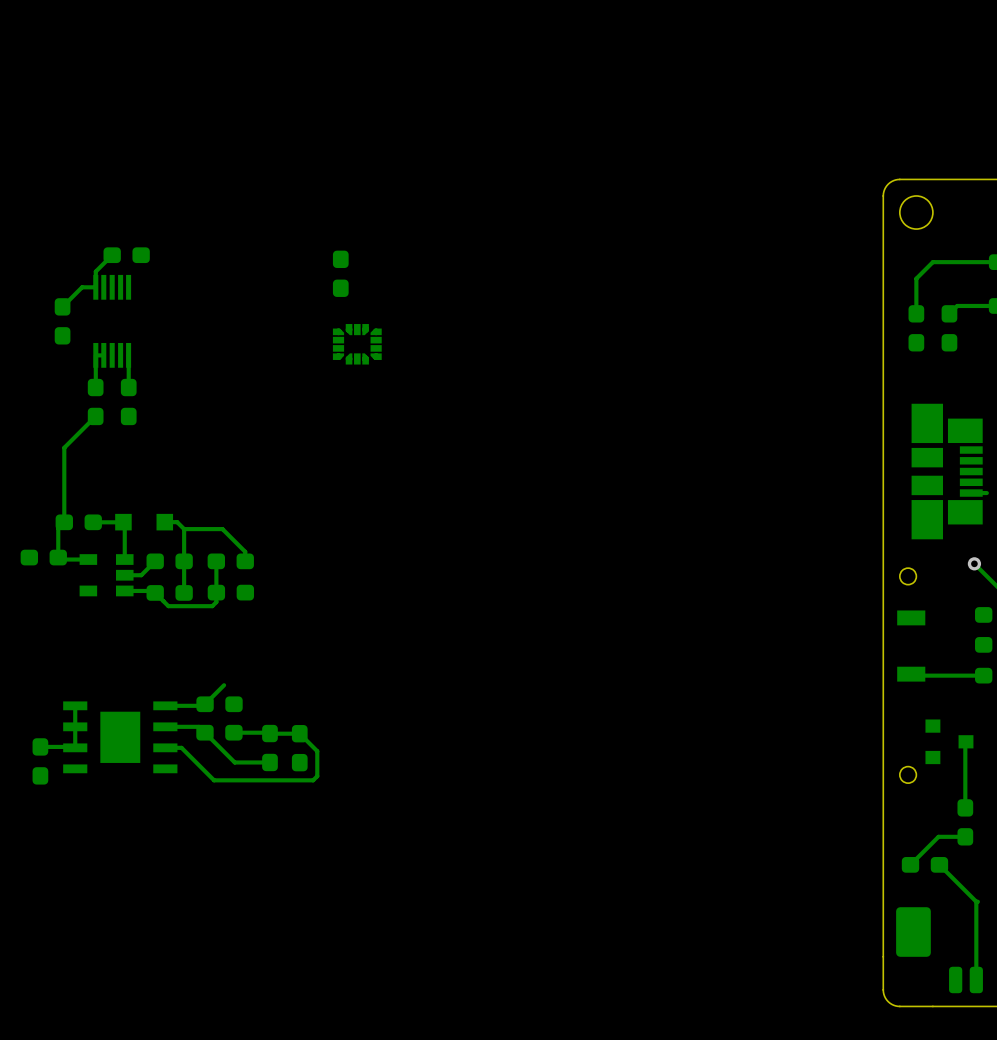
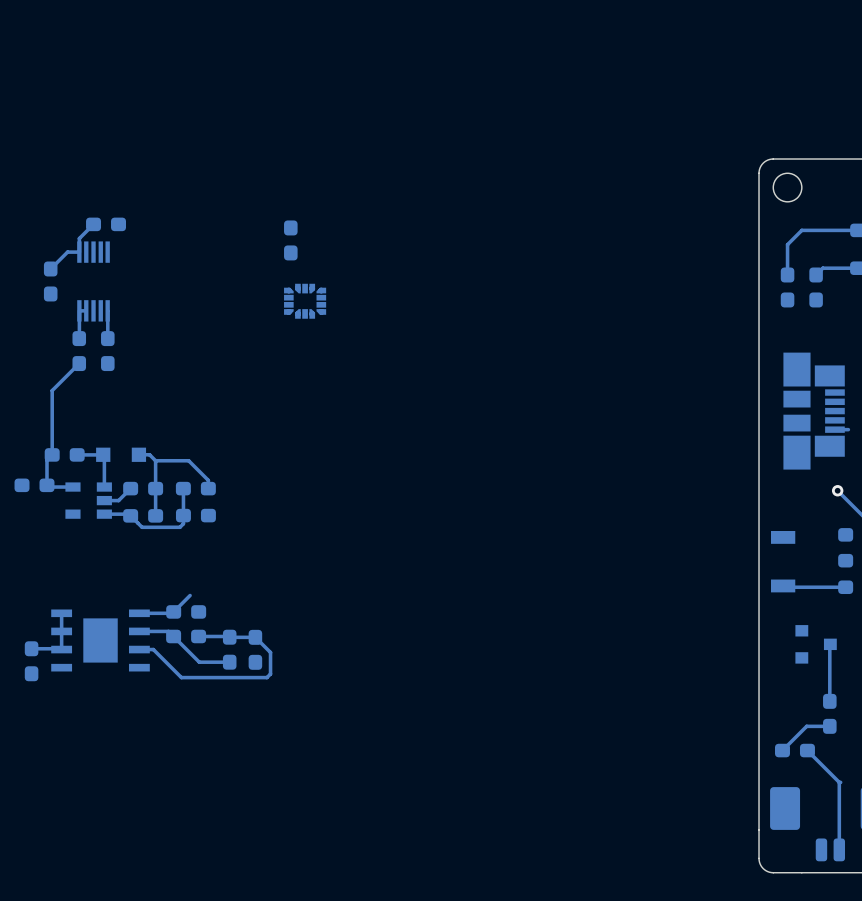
round board edge: [899, 567, 918, 586] -> none
round board edge: [899, 765, 918, 784] -> none

